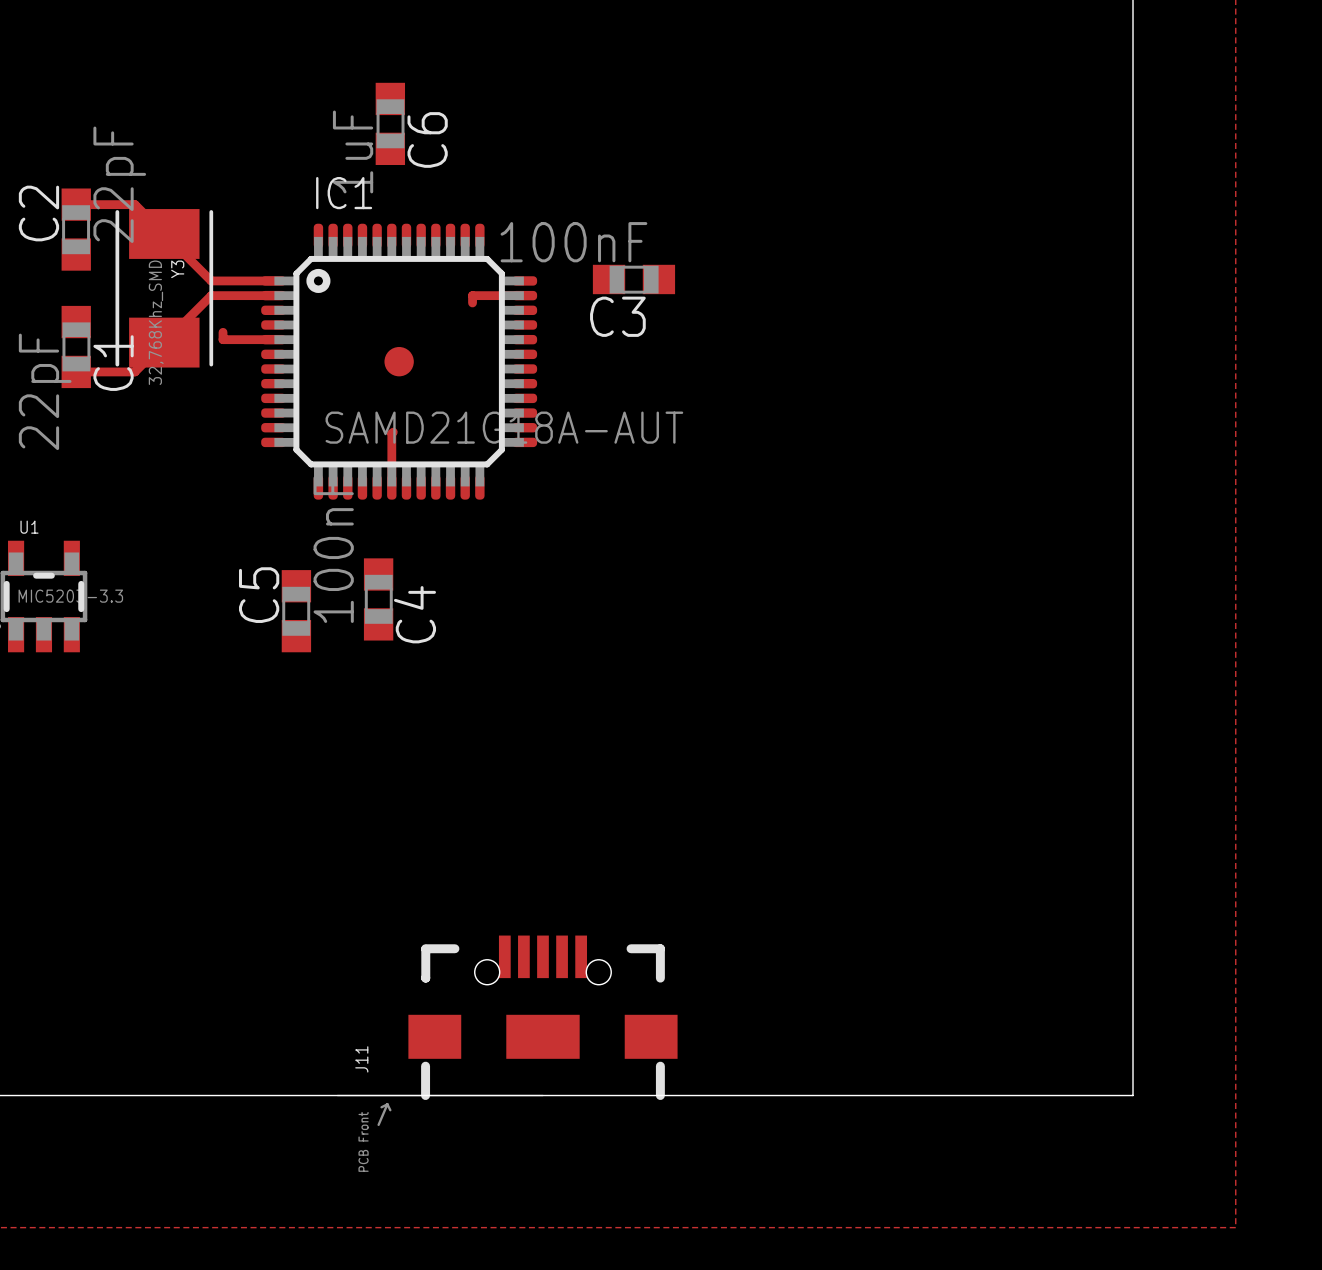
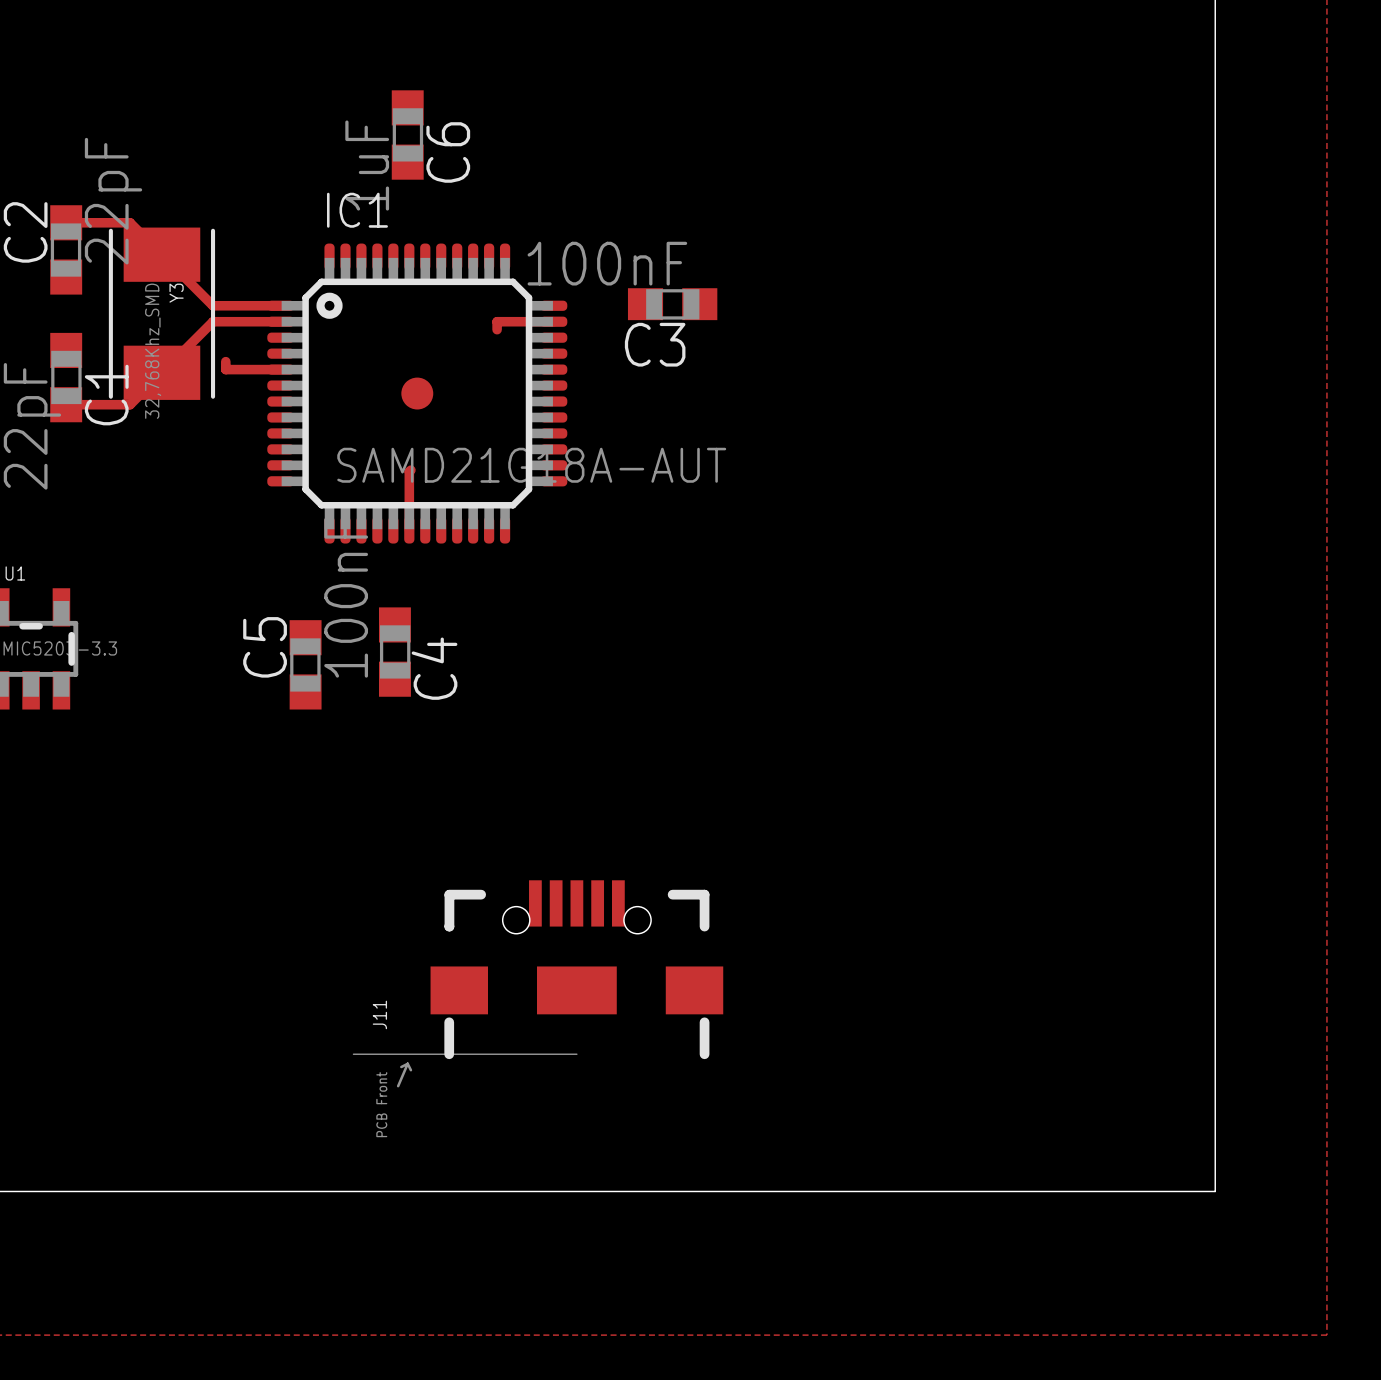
J11 position: (507, 1030) -> (538, 983)

